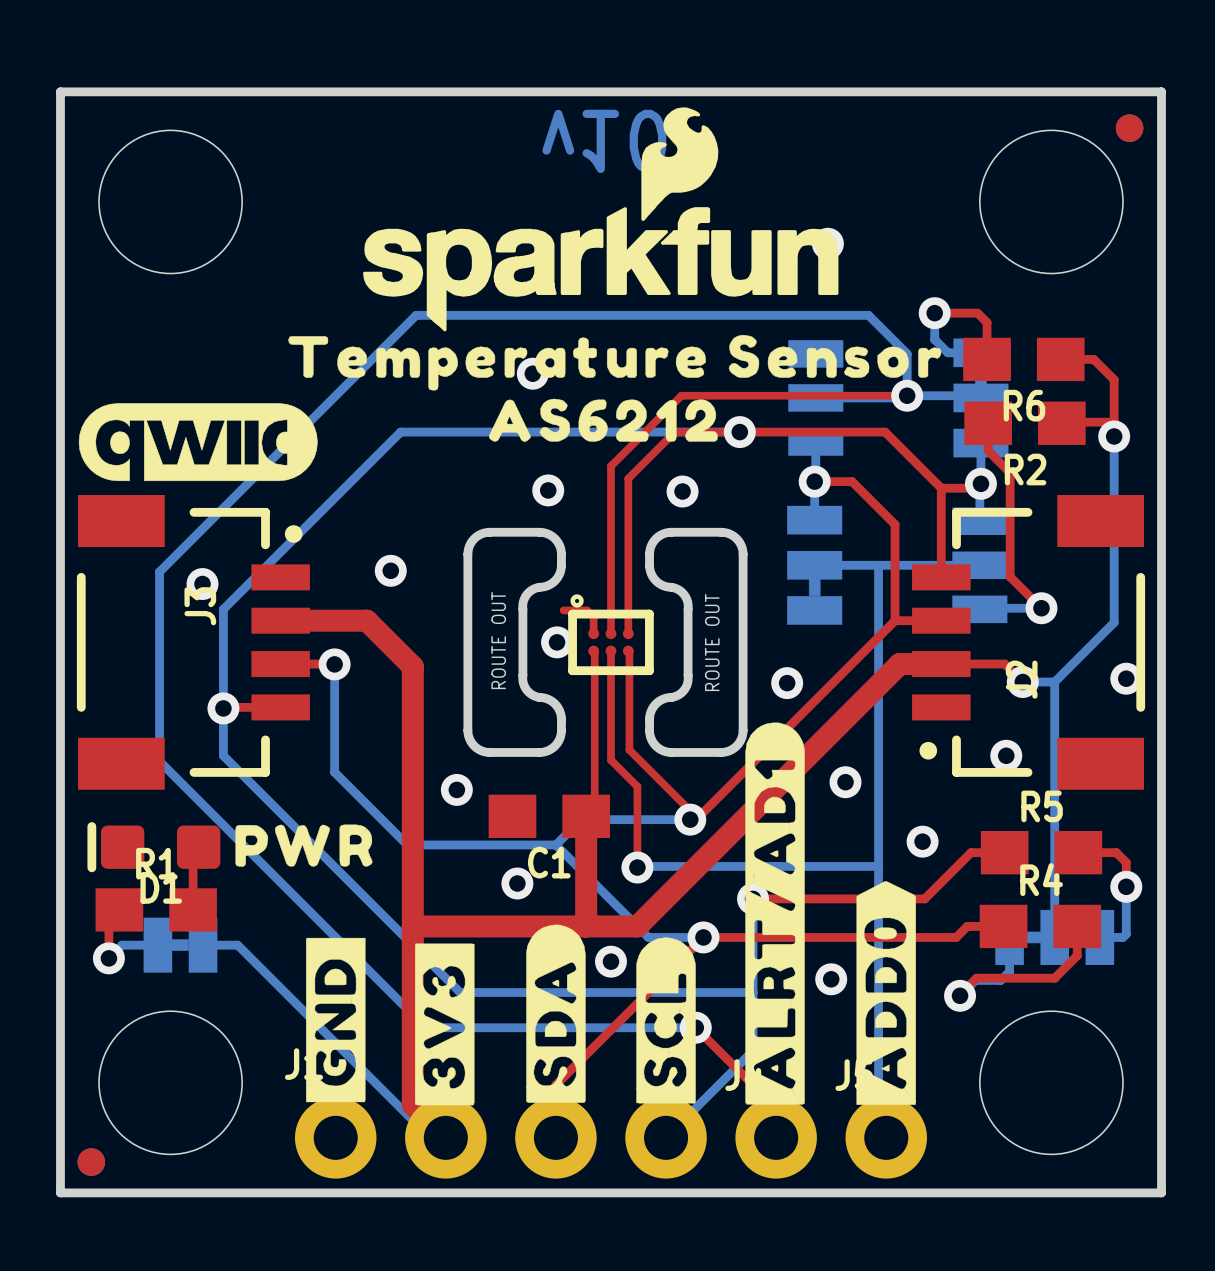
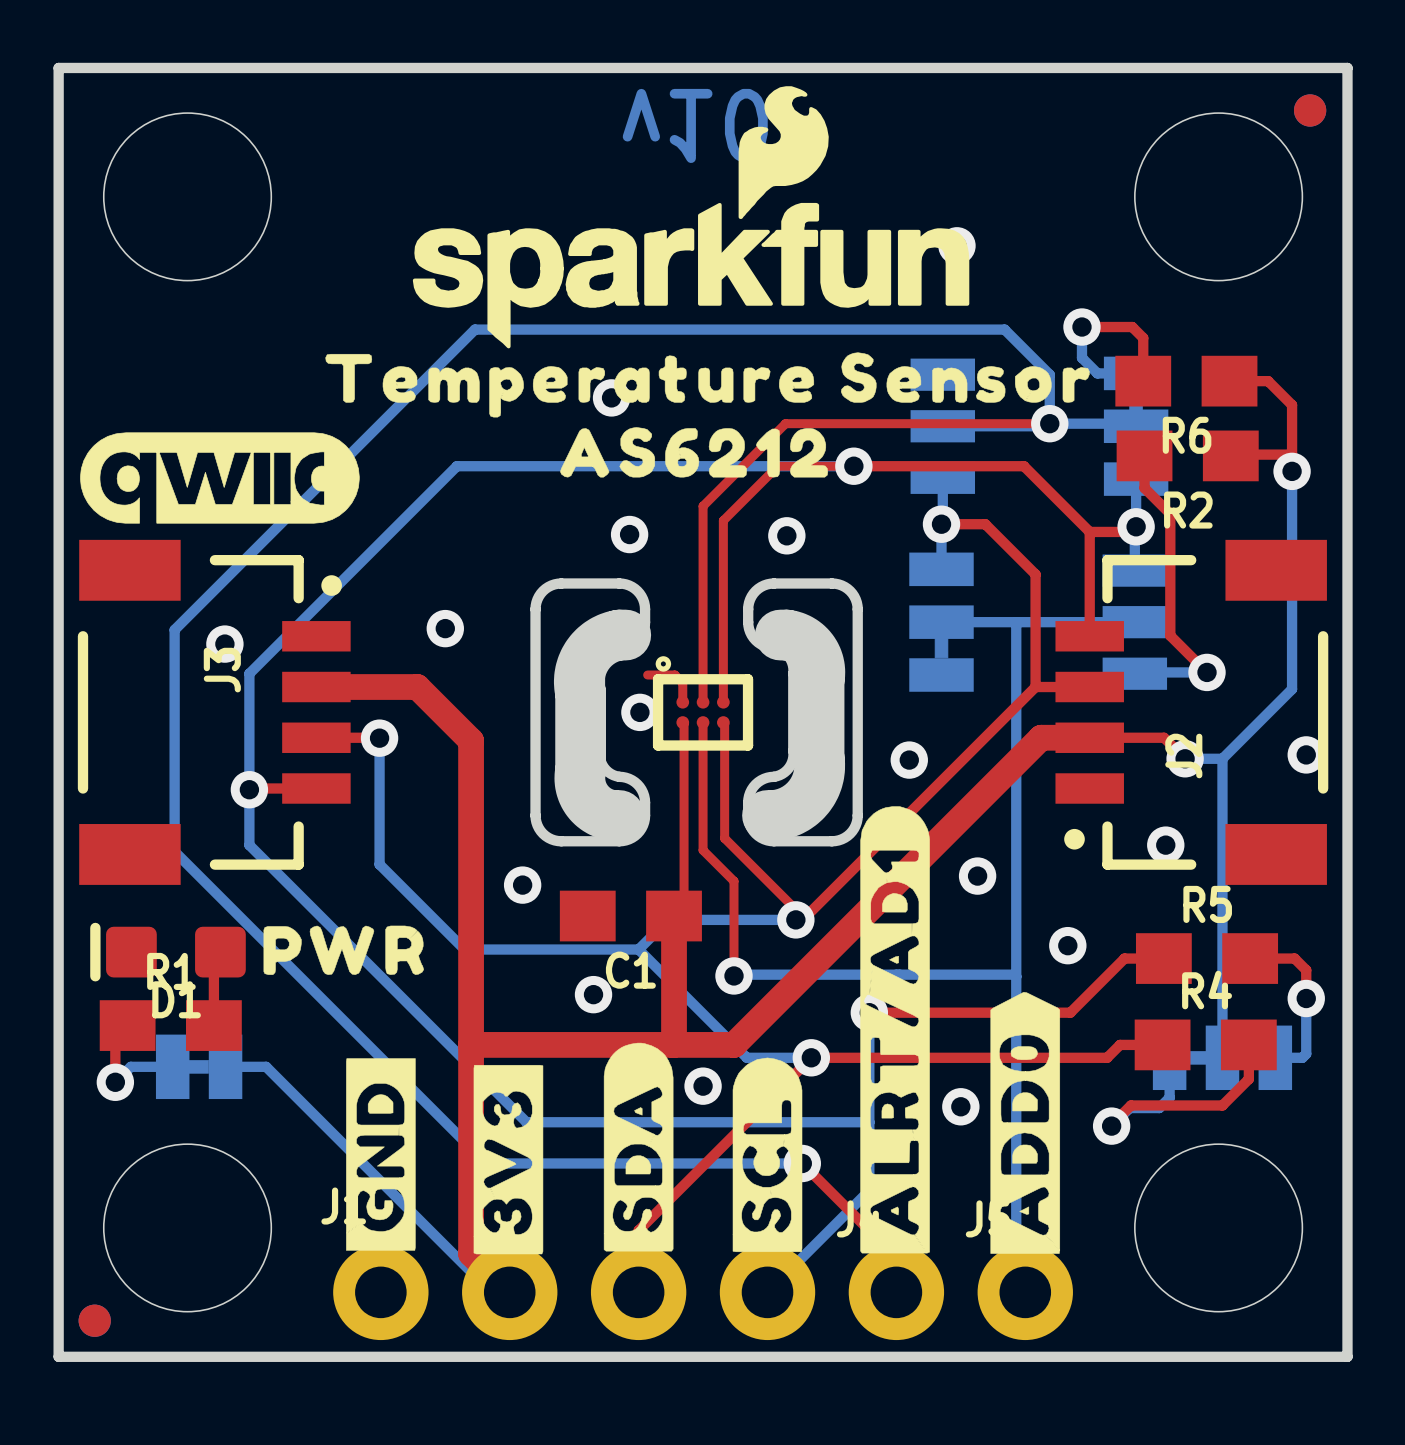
board edge: none -> (625, 635) (608, 638) (594, 647) (582, 665) (579, 681) (581, 788) (586, 800) (596, 809) (608, 814) (619, 815)
board edge: none -> (780, 635) (791, 635) (803, 641) (812, 650) (818, 662) (819, 769) (815, 786) (800, 804) (785, 813) (767, 815)

